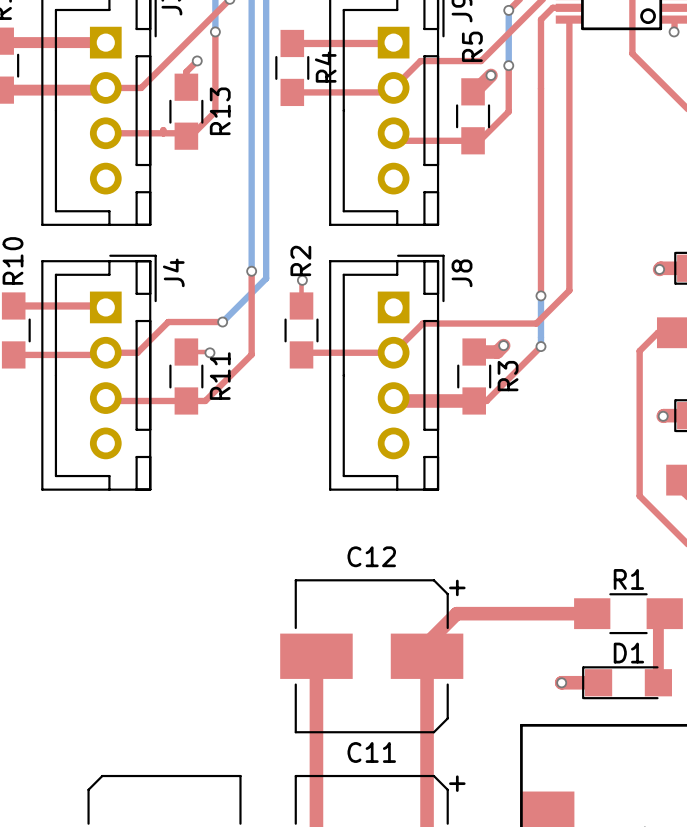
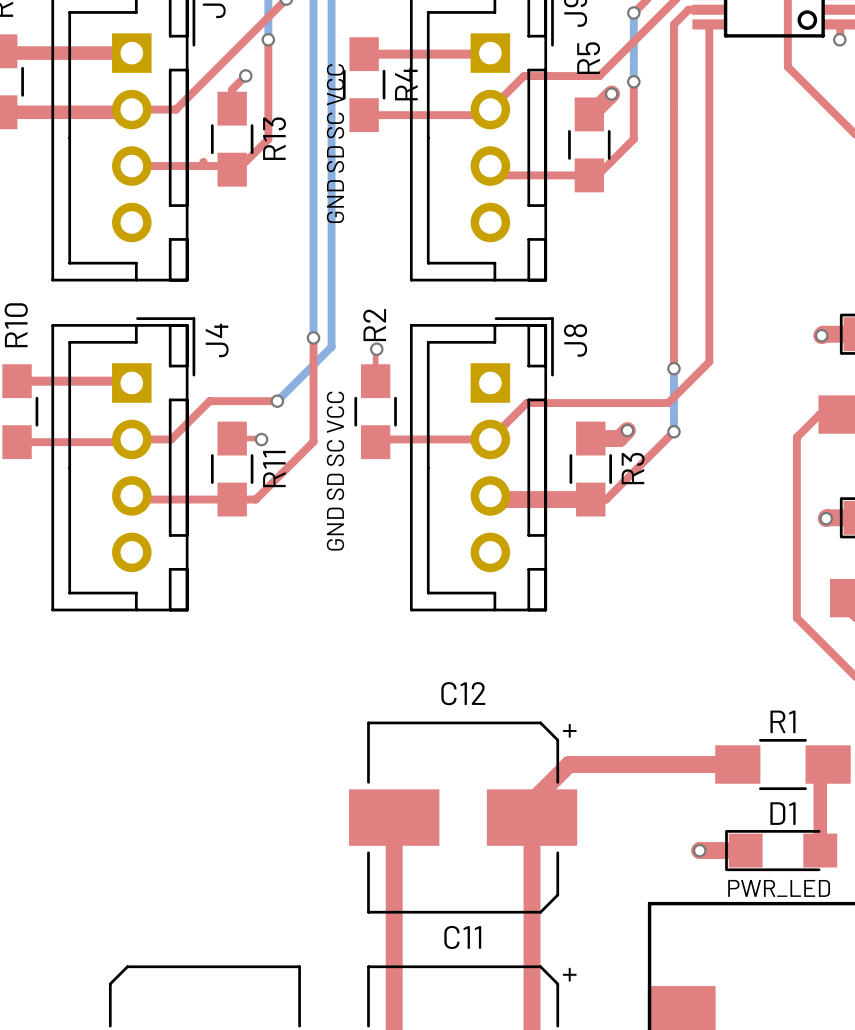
text: none -> GND SD SC VCC (335, 143)
text: none -> GND SD SC VCC (335, 471)
text: none -> PWR_LED (779, 888)

